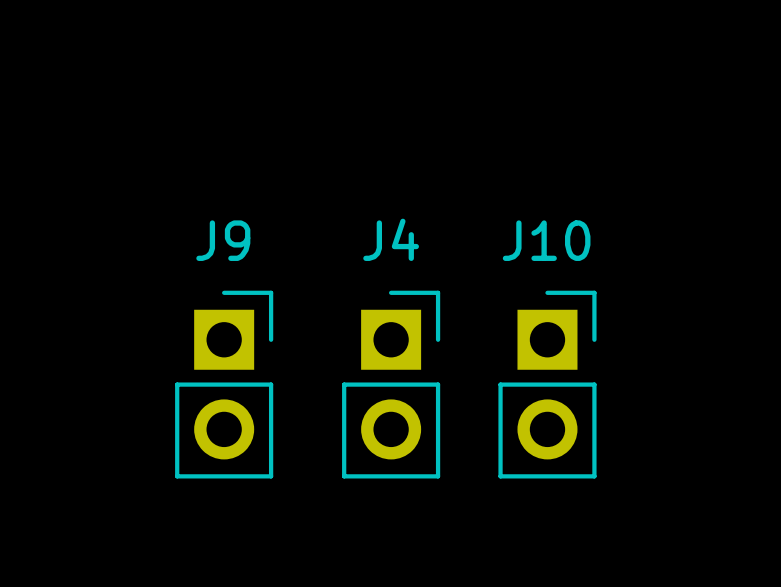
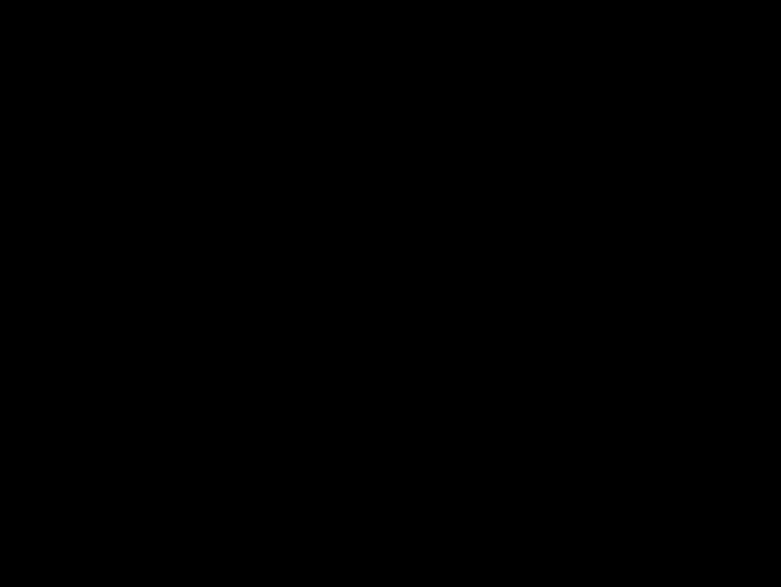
J9: (224, 384) -> none
J4: (391, 384) -> none
J10: (547, 384) -> none

